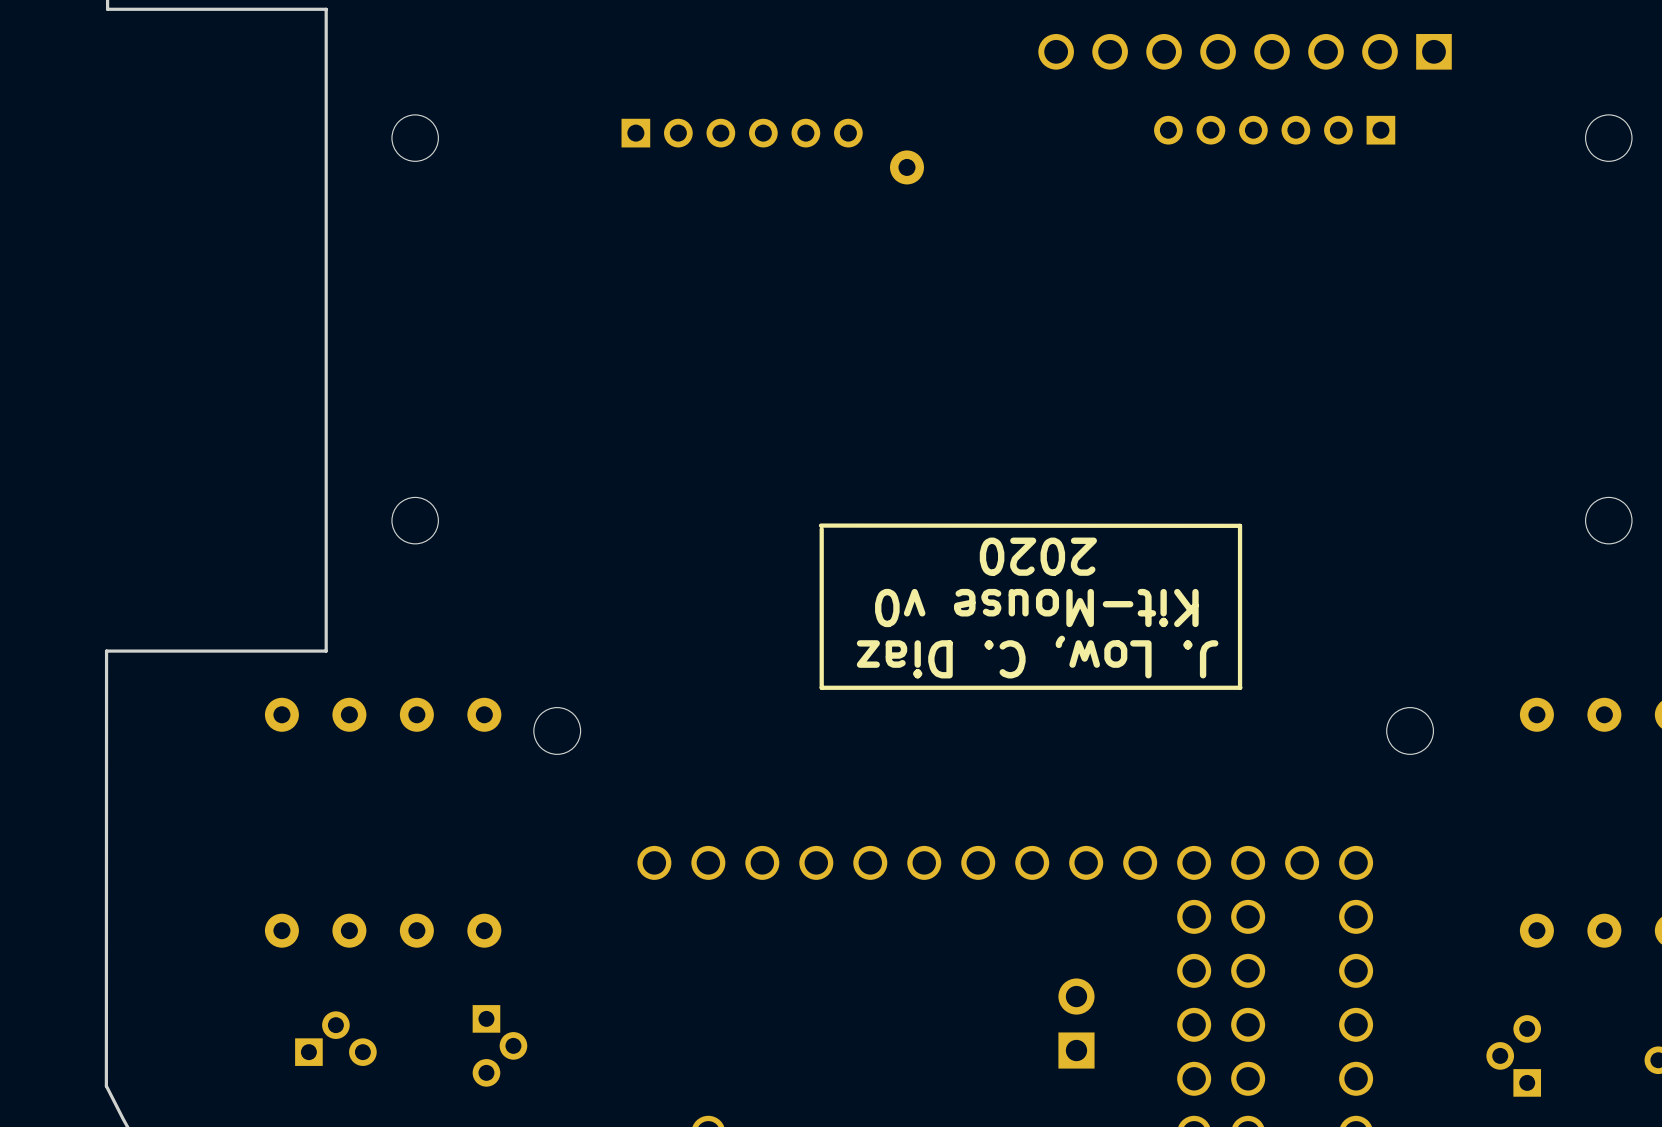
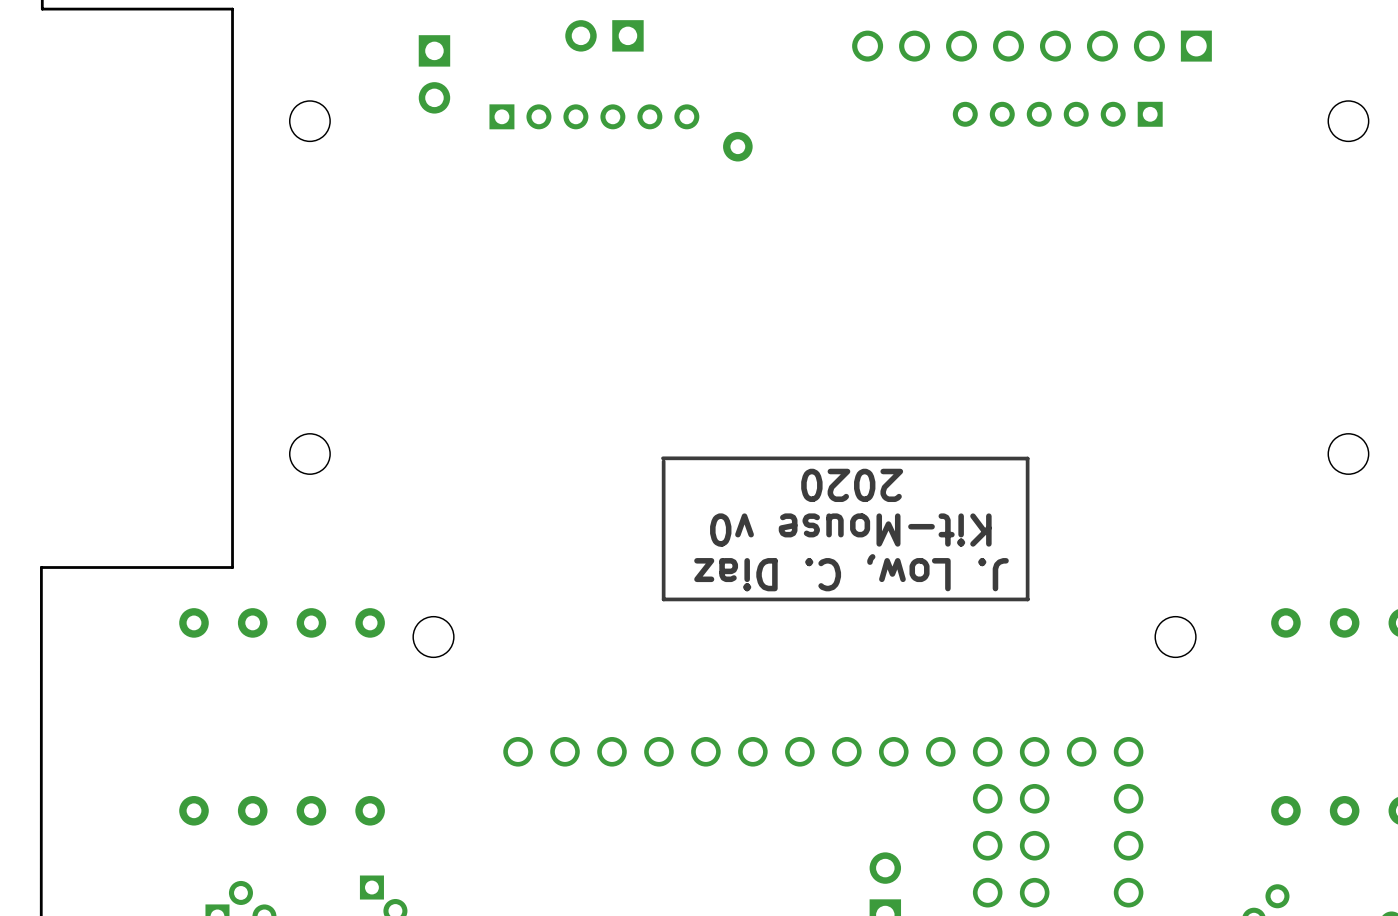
part: none -> (604, 35)
part: none -> (434, 74)

